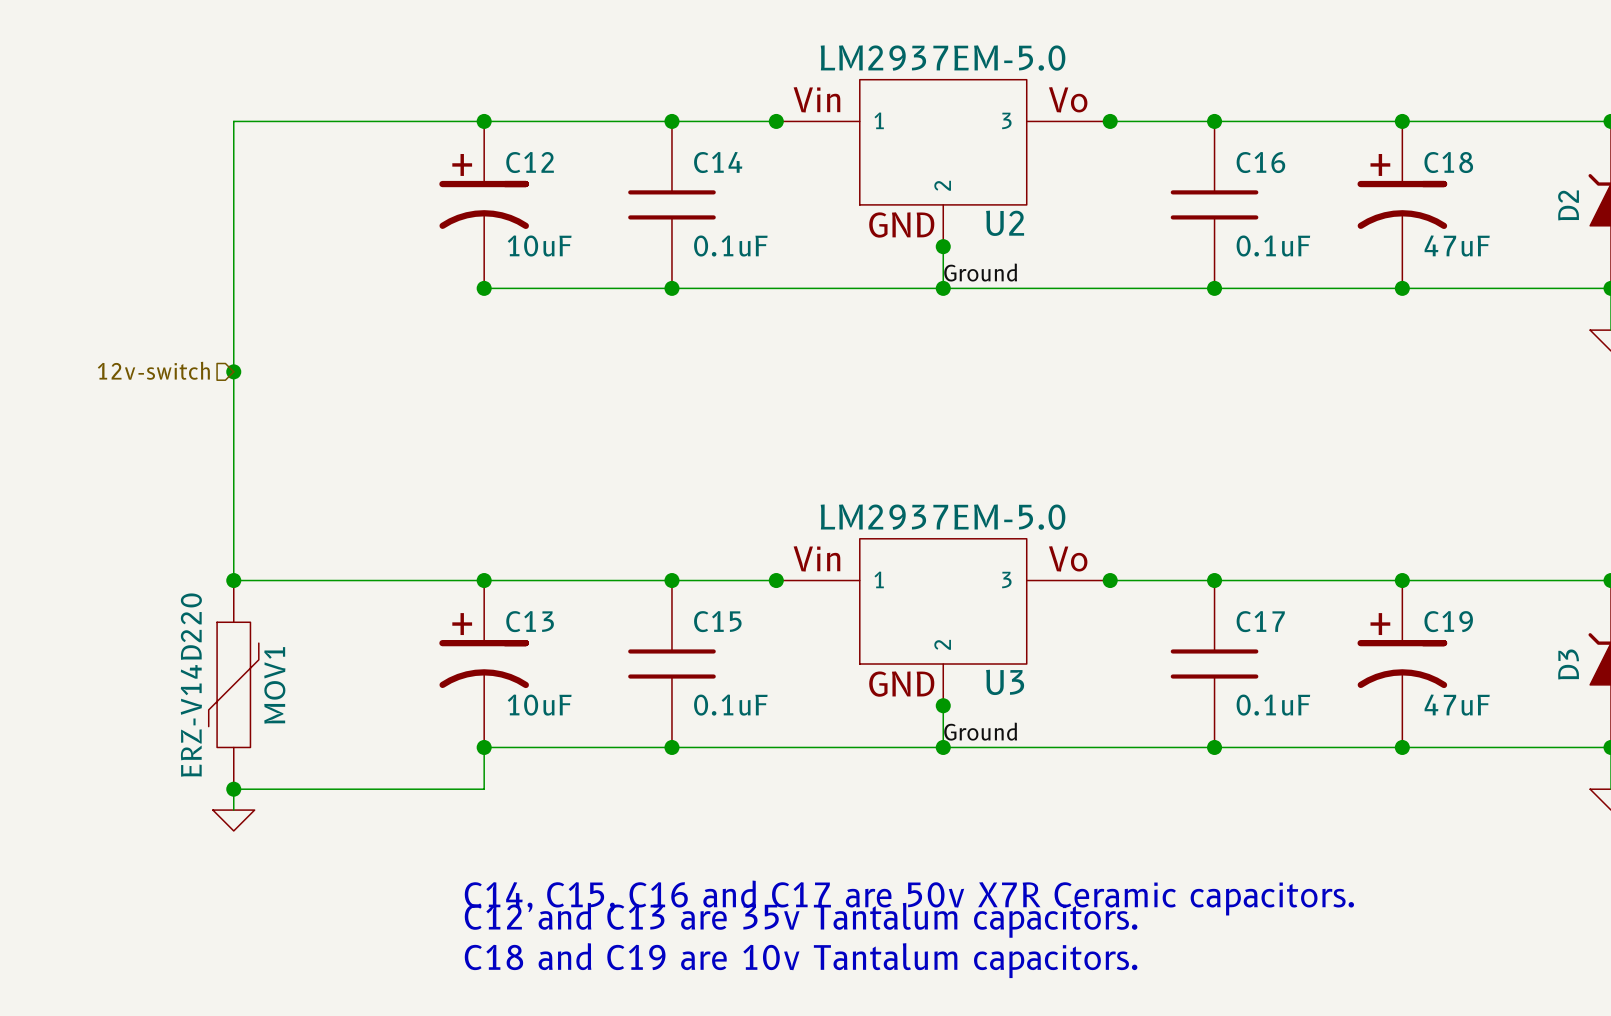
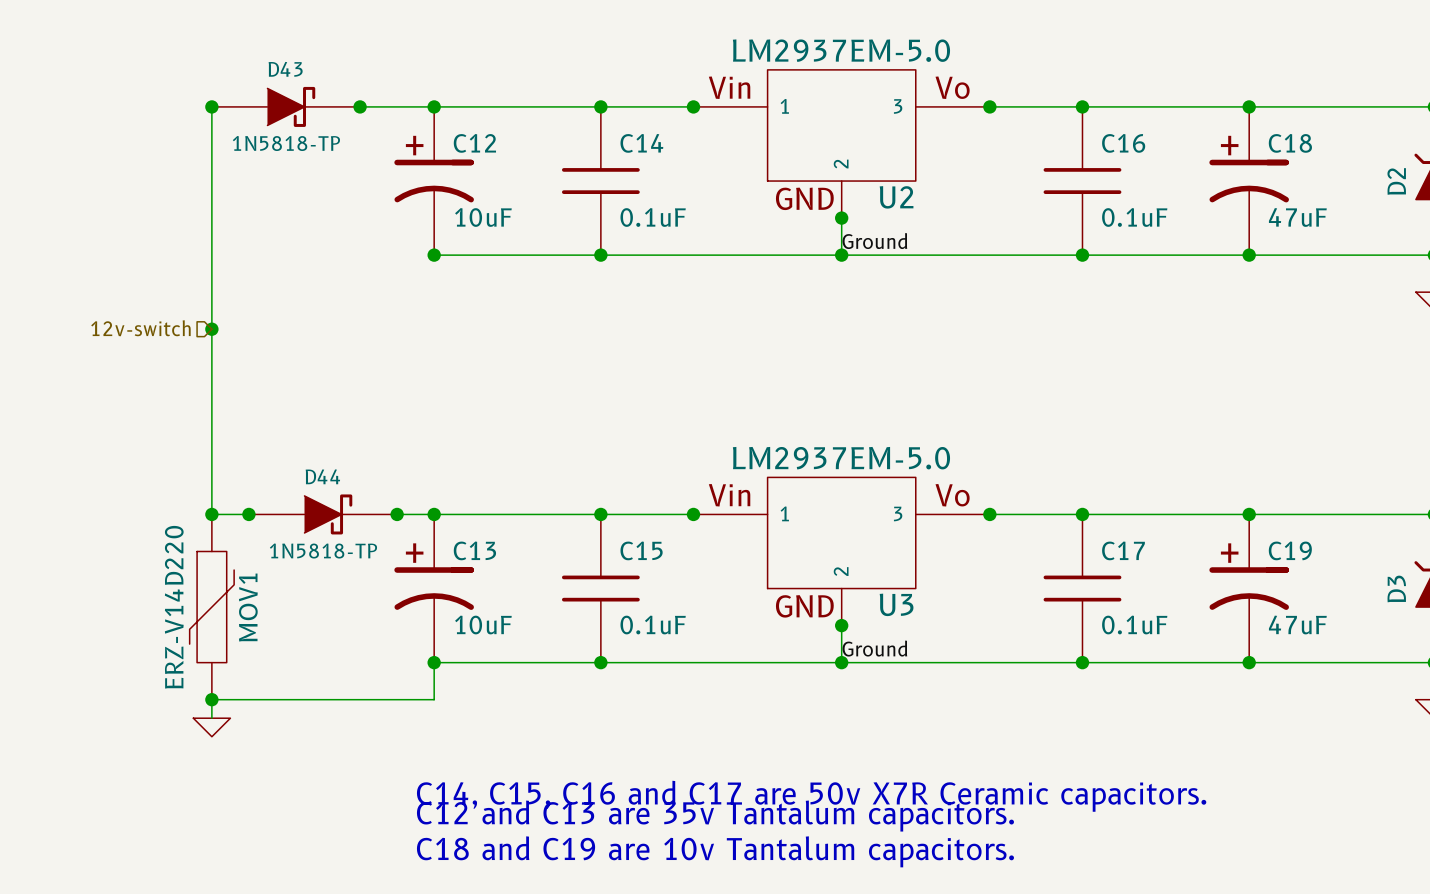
junction: none -> (211, 106)
D43: none -> 1N5818-TP (285, 106)
junction: none -> (360, 106)
junction: none -> (248, 514)
D44: none -> 1N5818-TP (323, 514)
junction: none -> (397, 514)

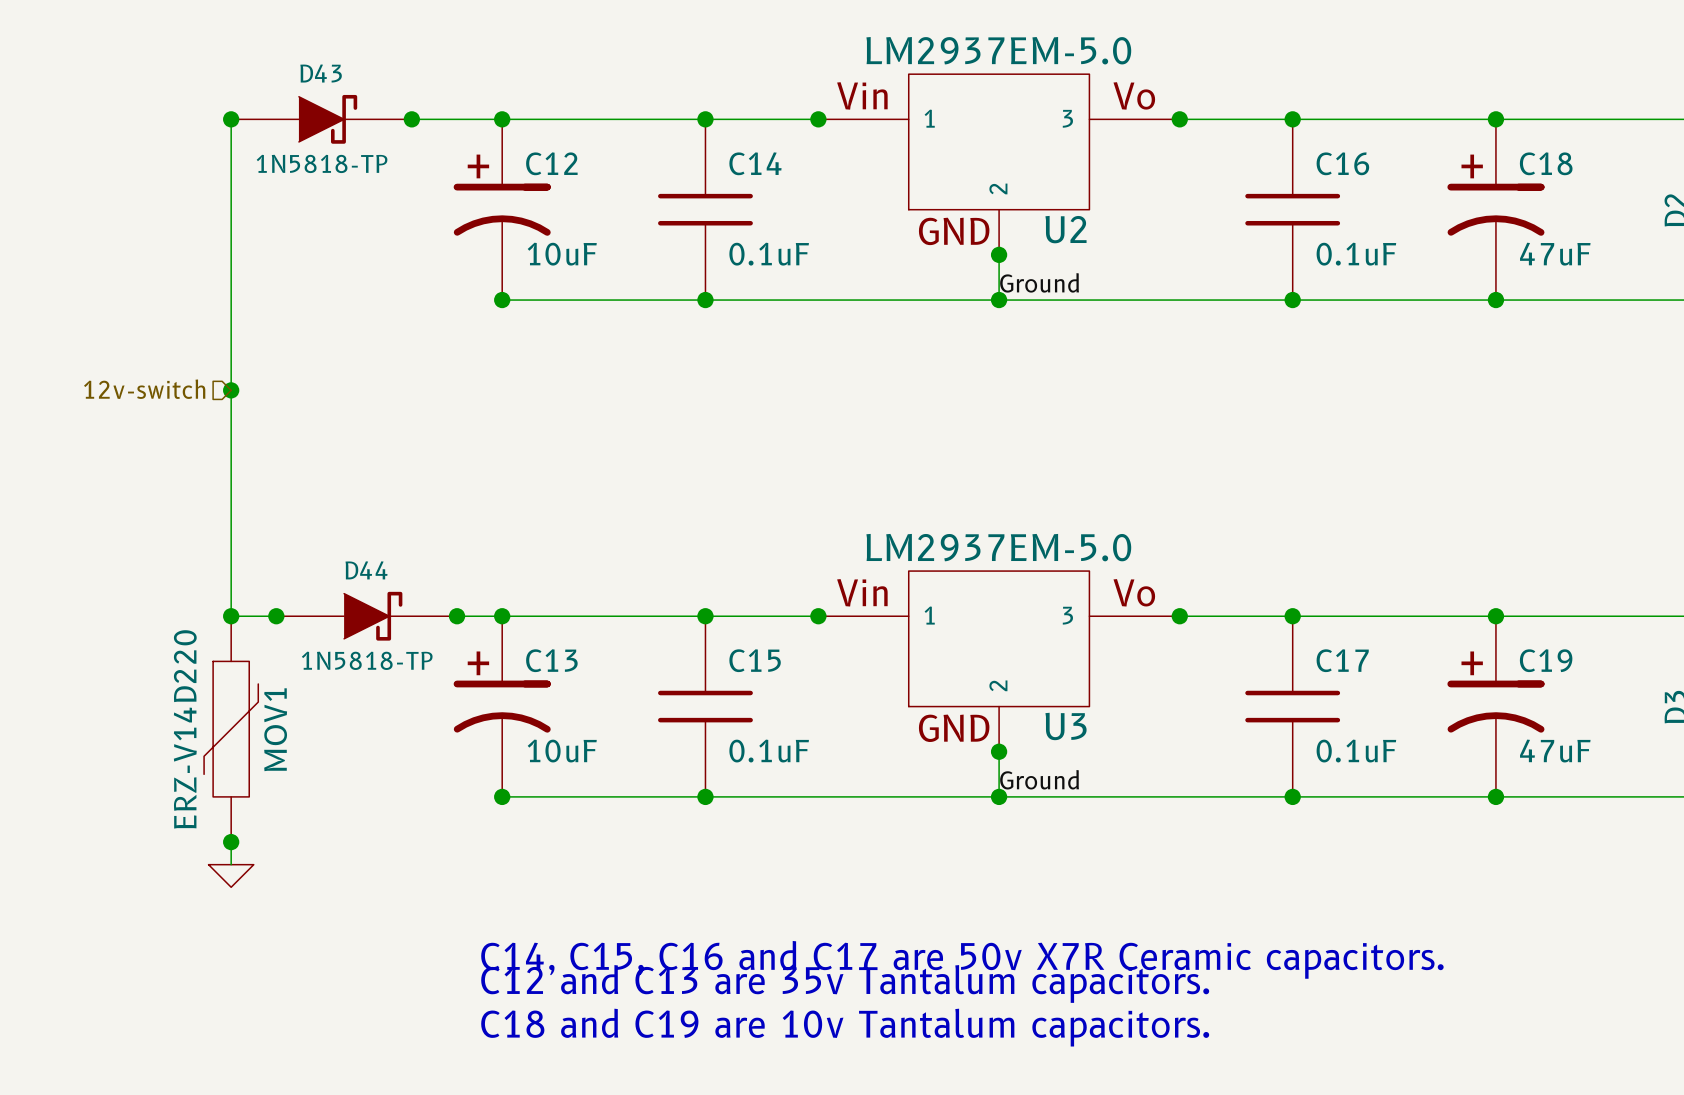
wire: (434, 662) (434, 699) (211, 699) -> none

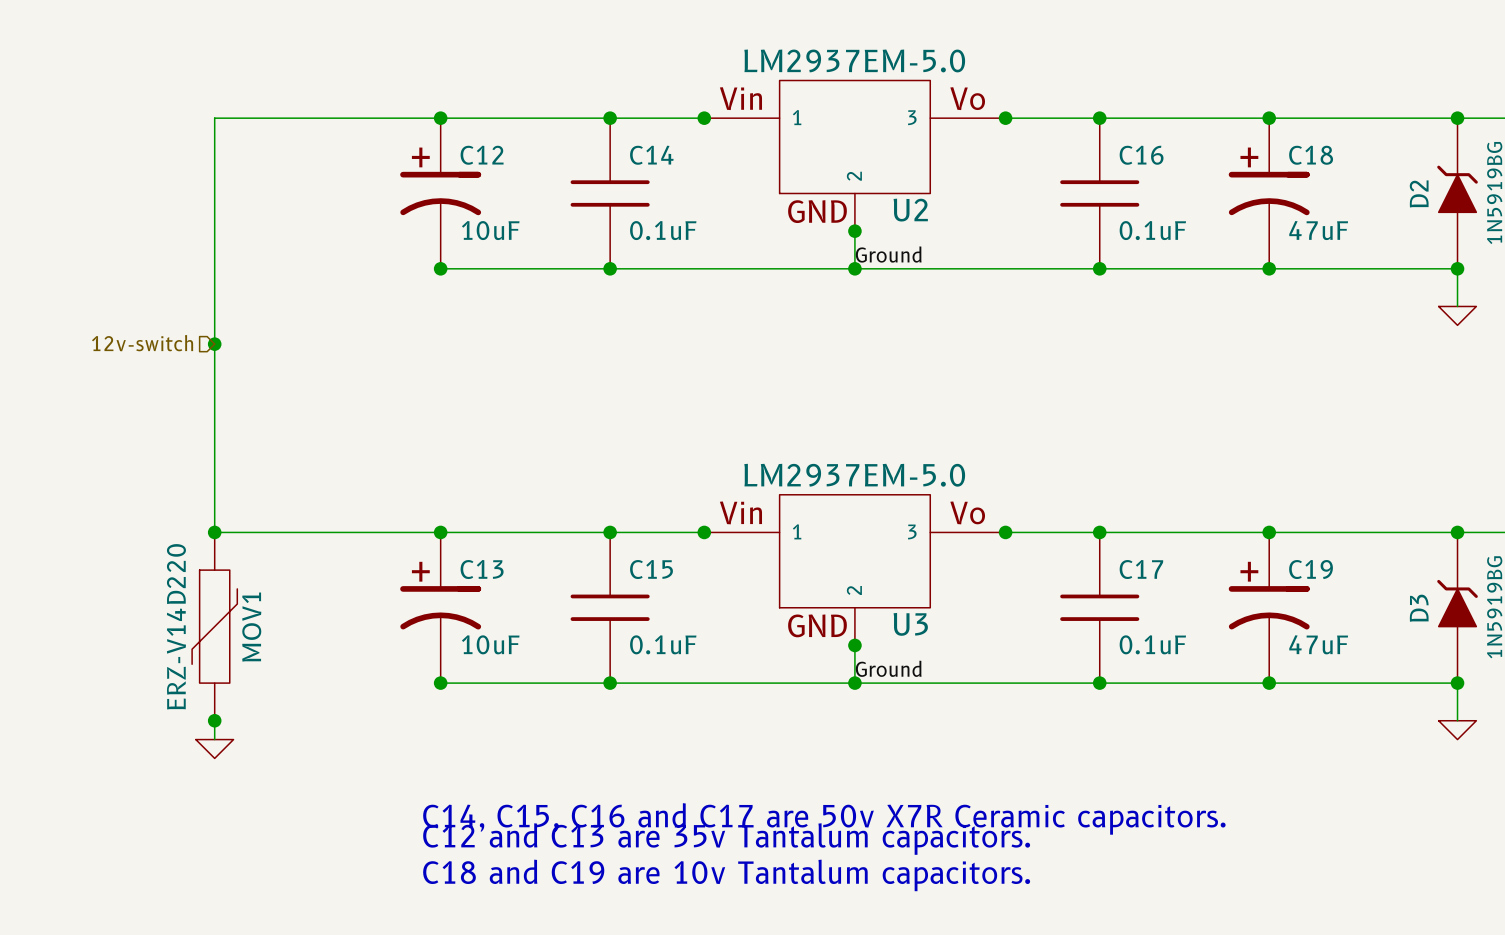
junction: (231, 119) -> none
D43: 1N5818-TP (321, 119) -> none
junction: (411, 119) -> none
junction: (276, 616) -> none
D44: 1N5818-TP (366, 616) -> none
junction: (457, 616) -> none

